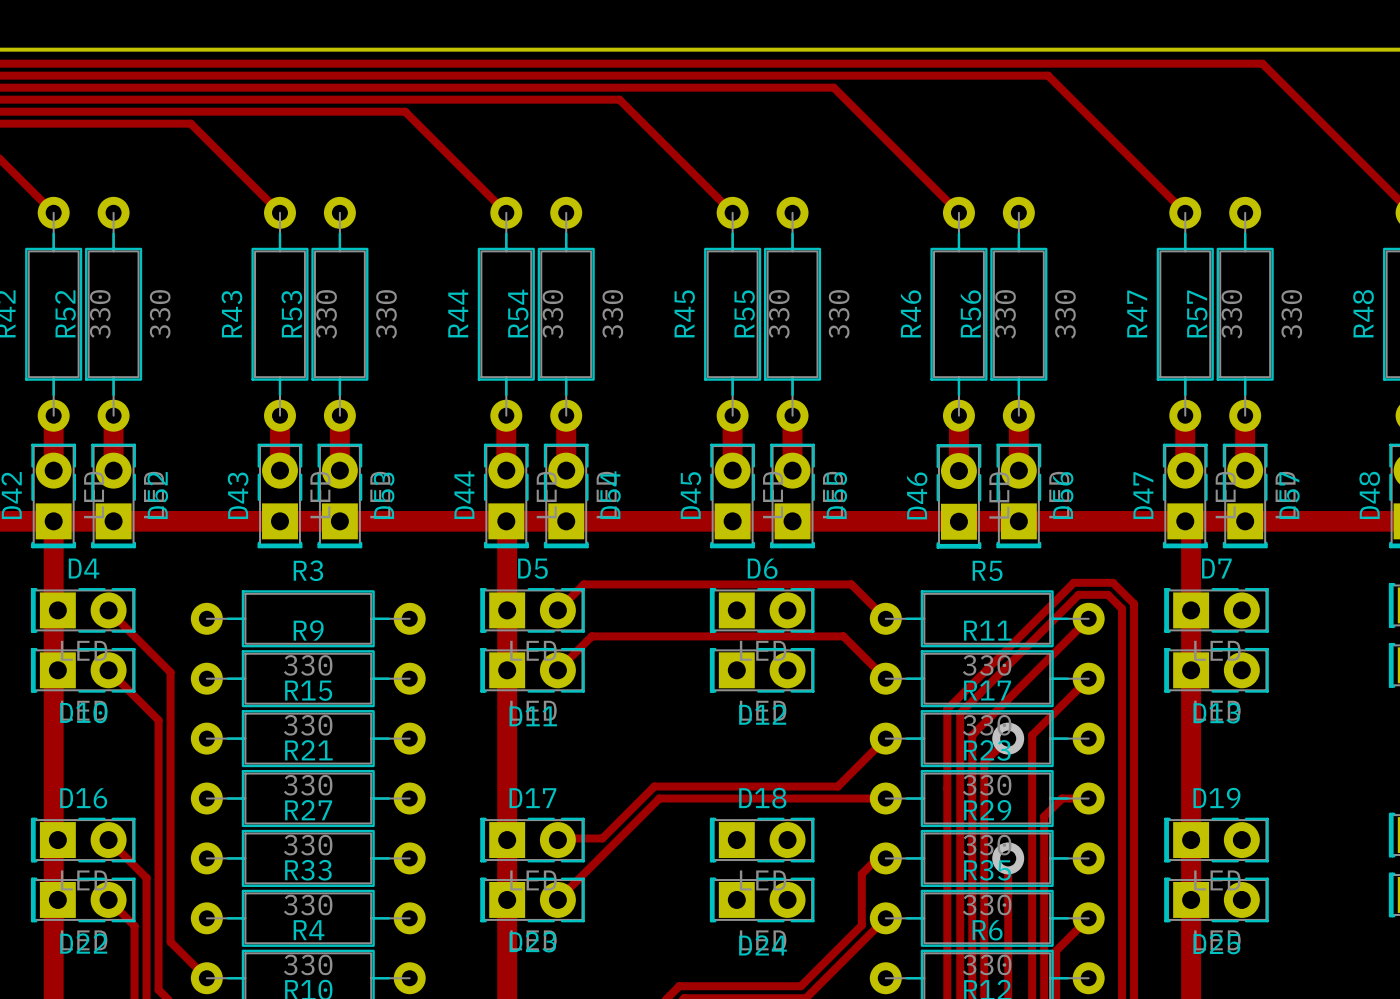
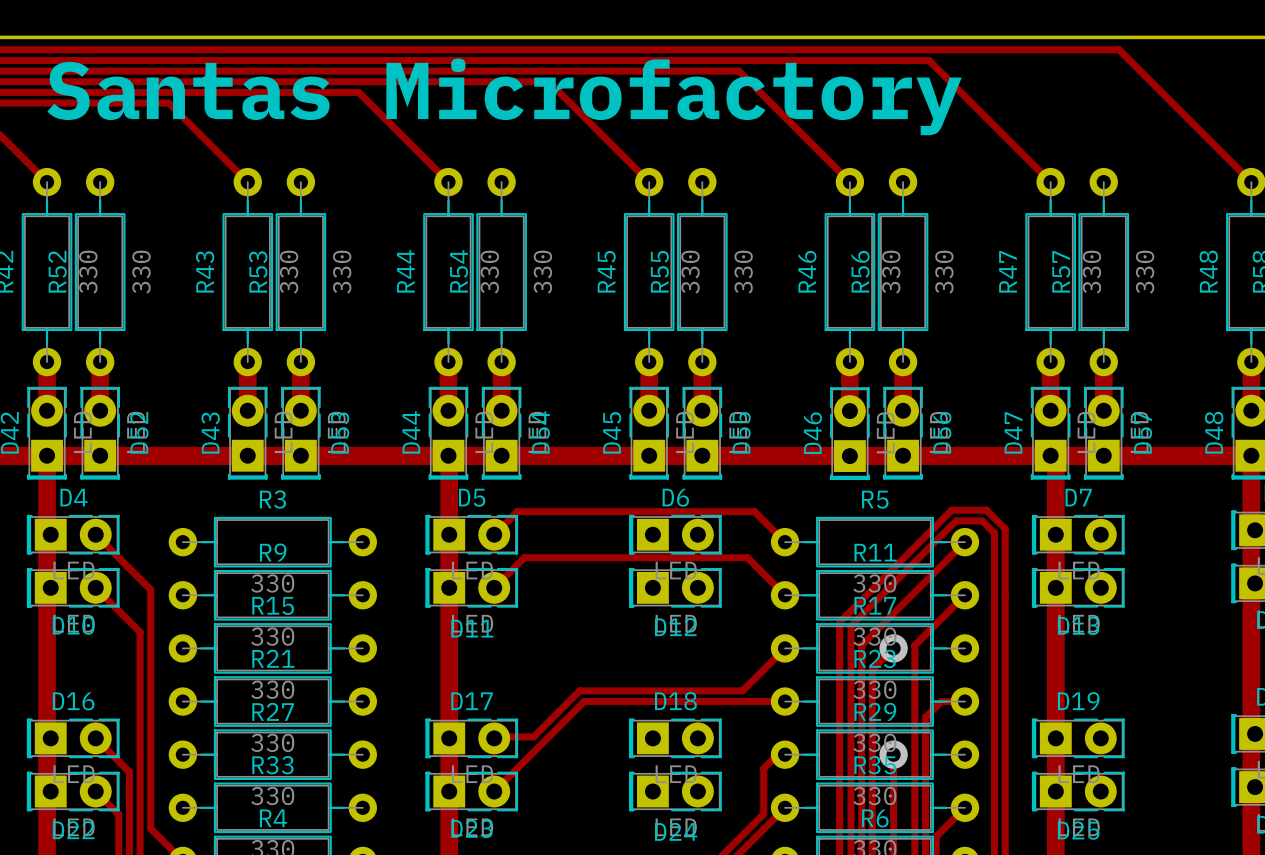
text: none -> Santas Microfactory (504, 96)

